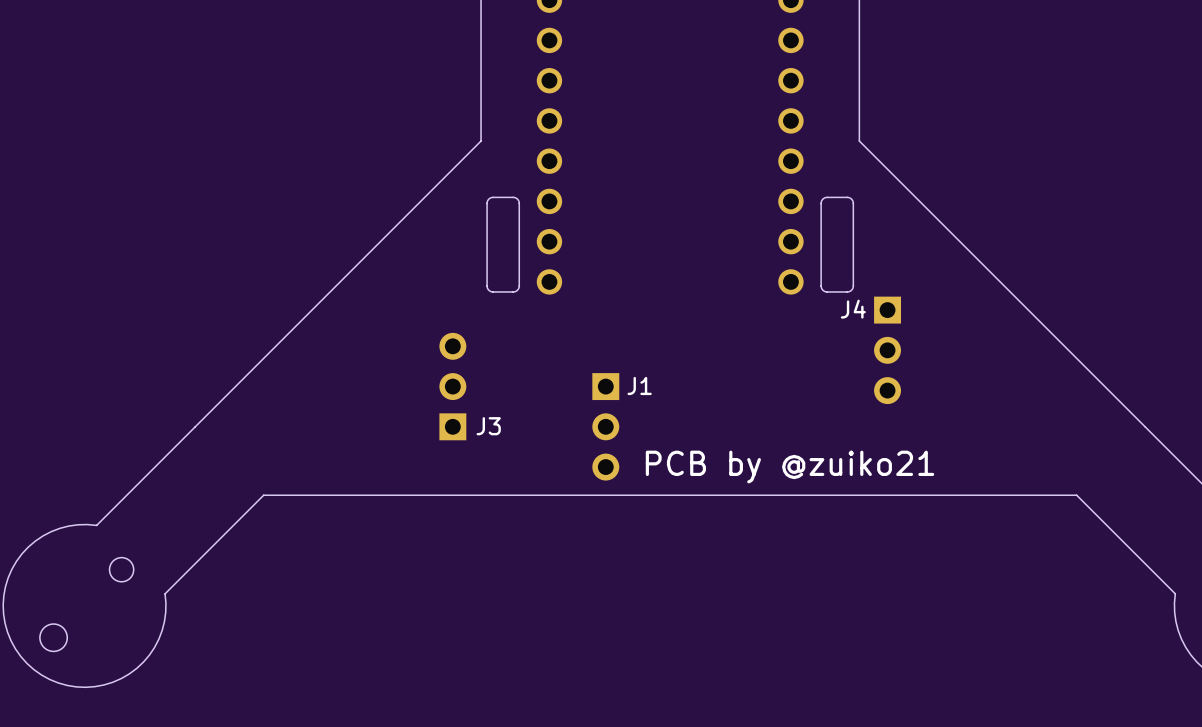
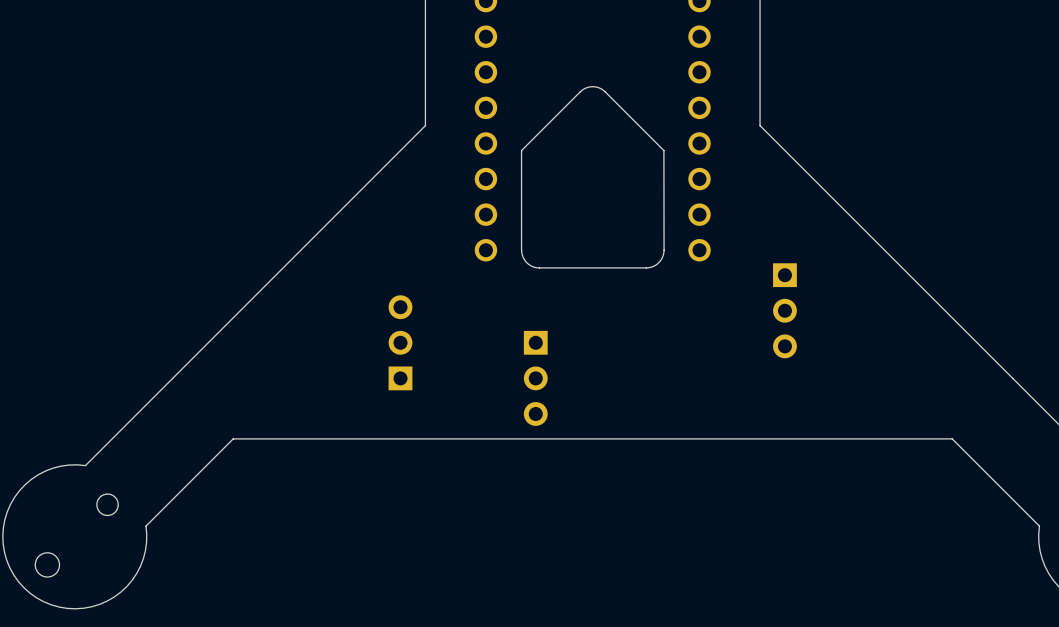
board edge: (513, 197) (491, 197) (487, 202) (487, 285) (491, 291) (513, 291) (519, 287) (519, 202) (517, 199) (513, 197) -> none
board edge: (847, 197) (825, 197) (821, 202) (821, 285) (825, 291) (847, 291) (853, 287) (853, 202) (851, 198) (847, 197) -> none
board edge: none -> (521, 250) (526, 262) (539, 267) (648, 267) (657, 264) (662, 256) (663, 150) (599, 88) (590, 86) (582, 90) (521, 150) (521, 250)
J4 name: J4 (853, 309) -> none
J1 name: J1 (639, 385) -> none
J3 name: J3 (488, 426) -> none
text: PCB by @zuiko21 (789, 467) -> none

